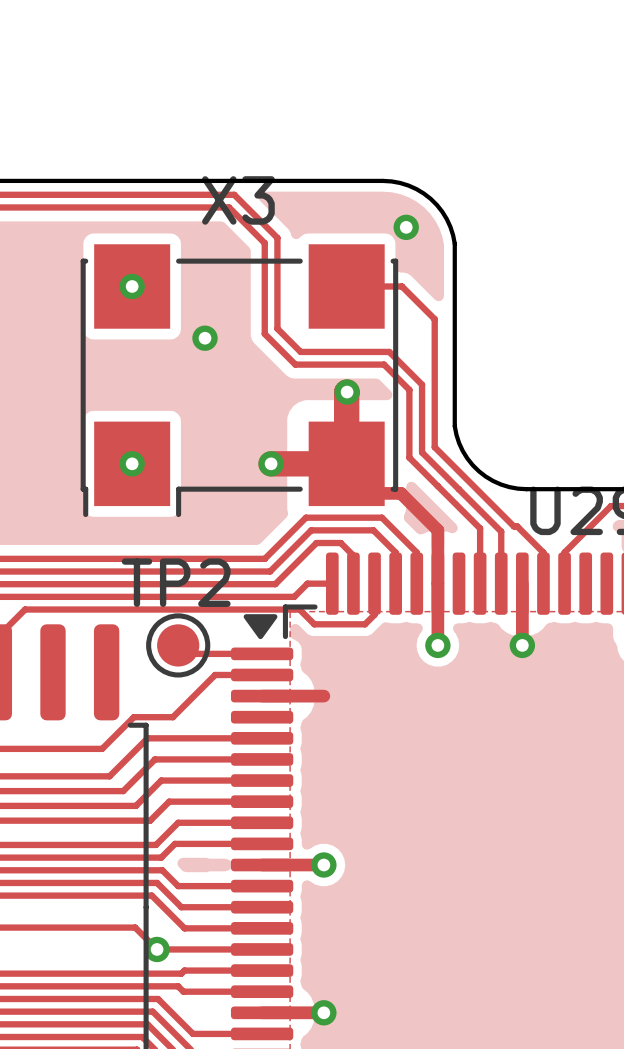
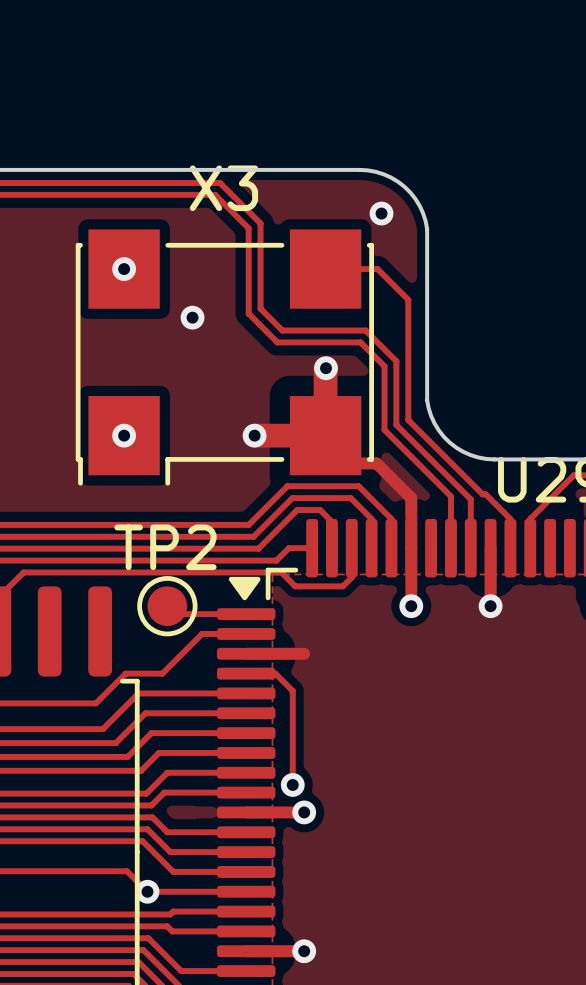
track: none -> (246, 673) (275, 673) (292, 690) (292, 784)
via: none -> (292, 784)

